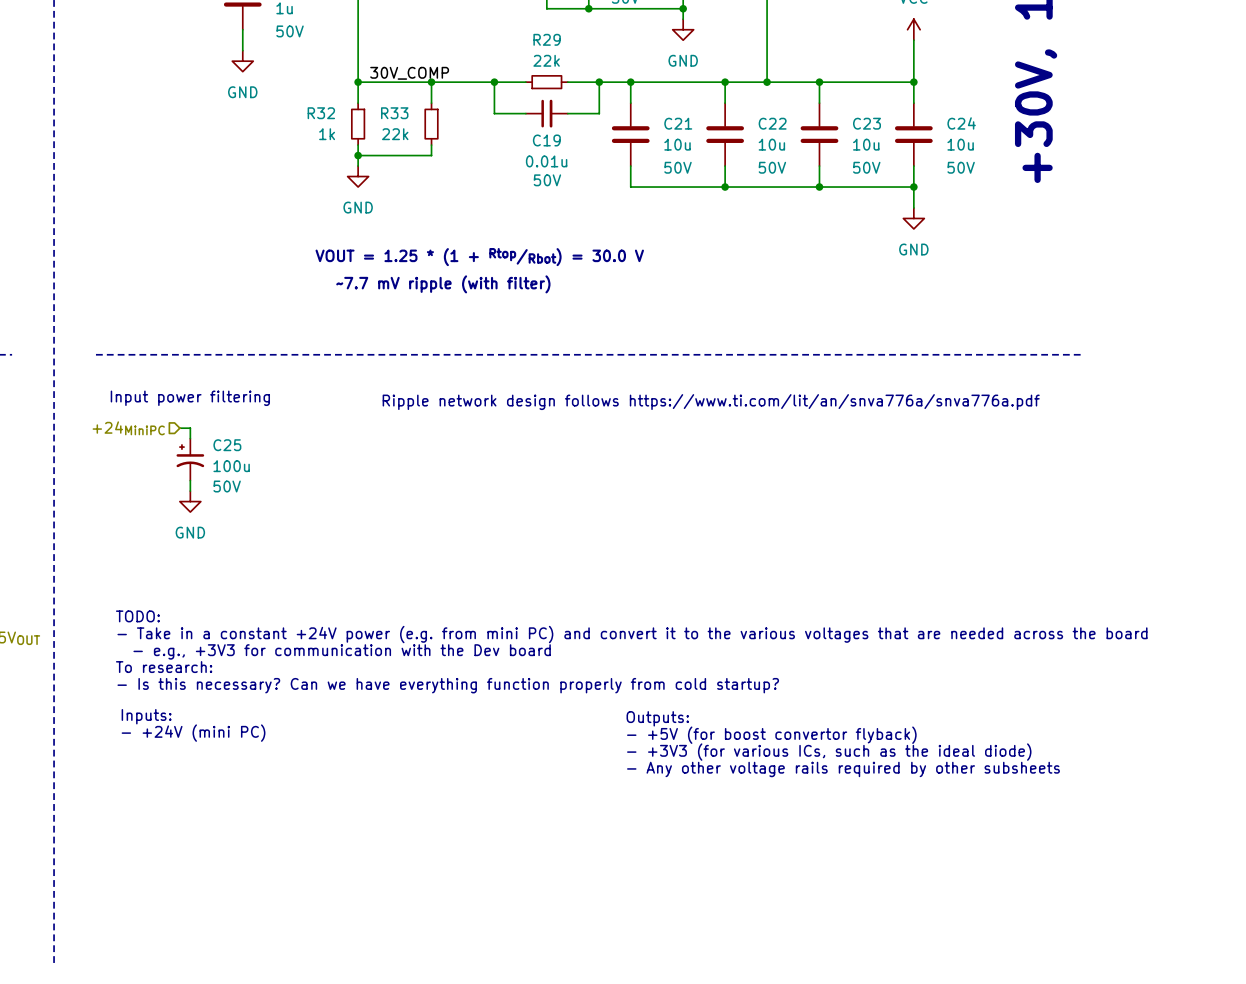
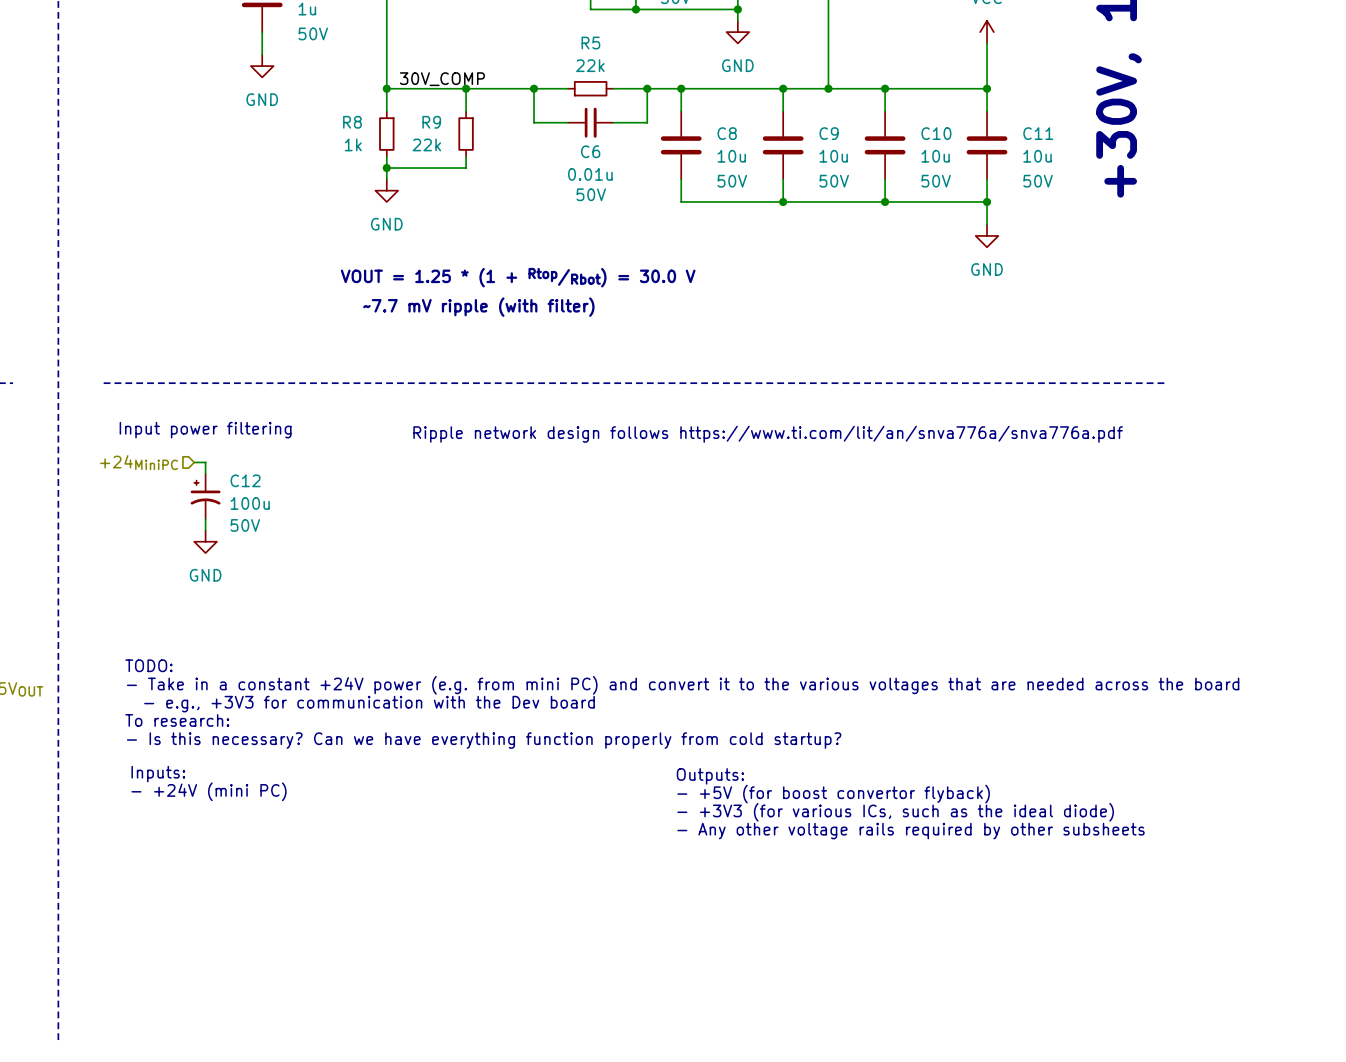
R29 name: R29 (547, 39) -> R5 (590, 43)
R32 name: R32 (321, 113) -> R8 (352, 122)
R33 name: R33 (394, 113) -> R9 (431, 122)
C21 name: C21 (678, 123) -> C8 (727, 133)
C22 name: C22 (772, 123) -> C9 (829, 133)
C23 name: C23 (867, 123) -> C10 (936, 133)
C24 name: C24 (961, 123) -> C11 (1038, 133)
C19 name: C19 (546, 140) -> C6 (590, 151)
C25 name: C25 (227, 445) -> C12 (245, 480)

